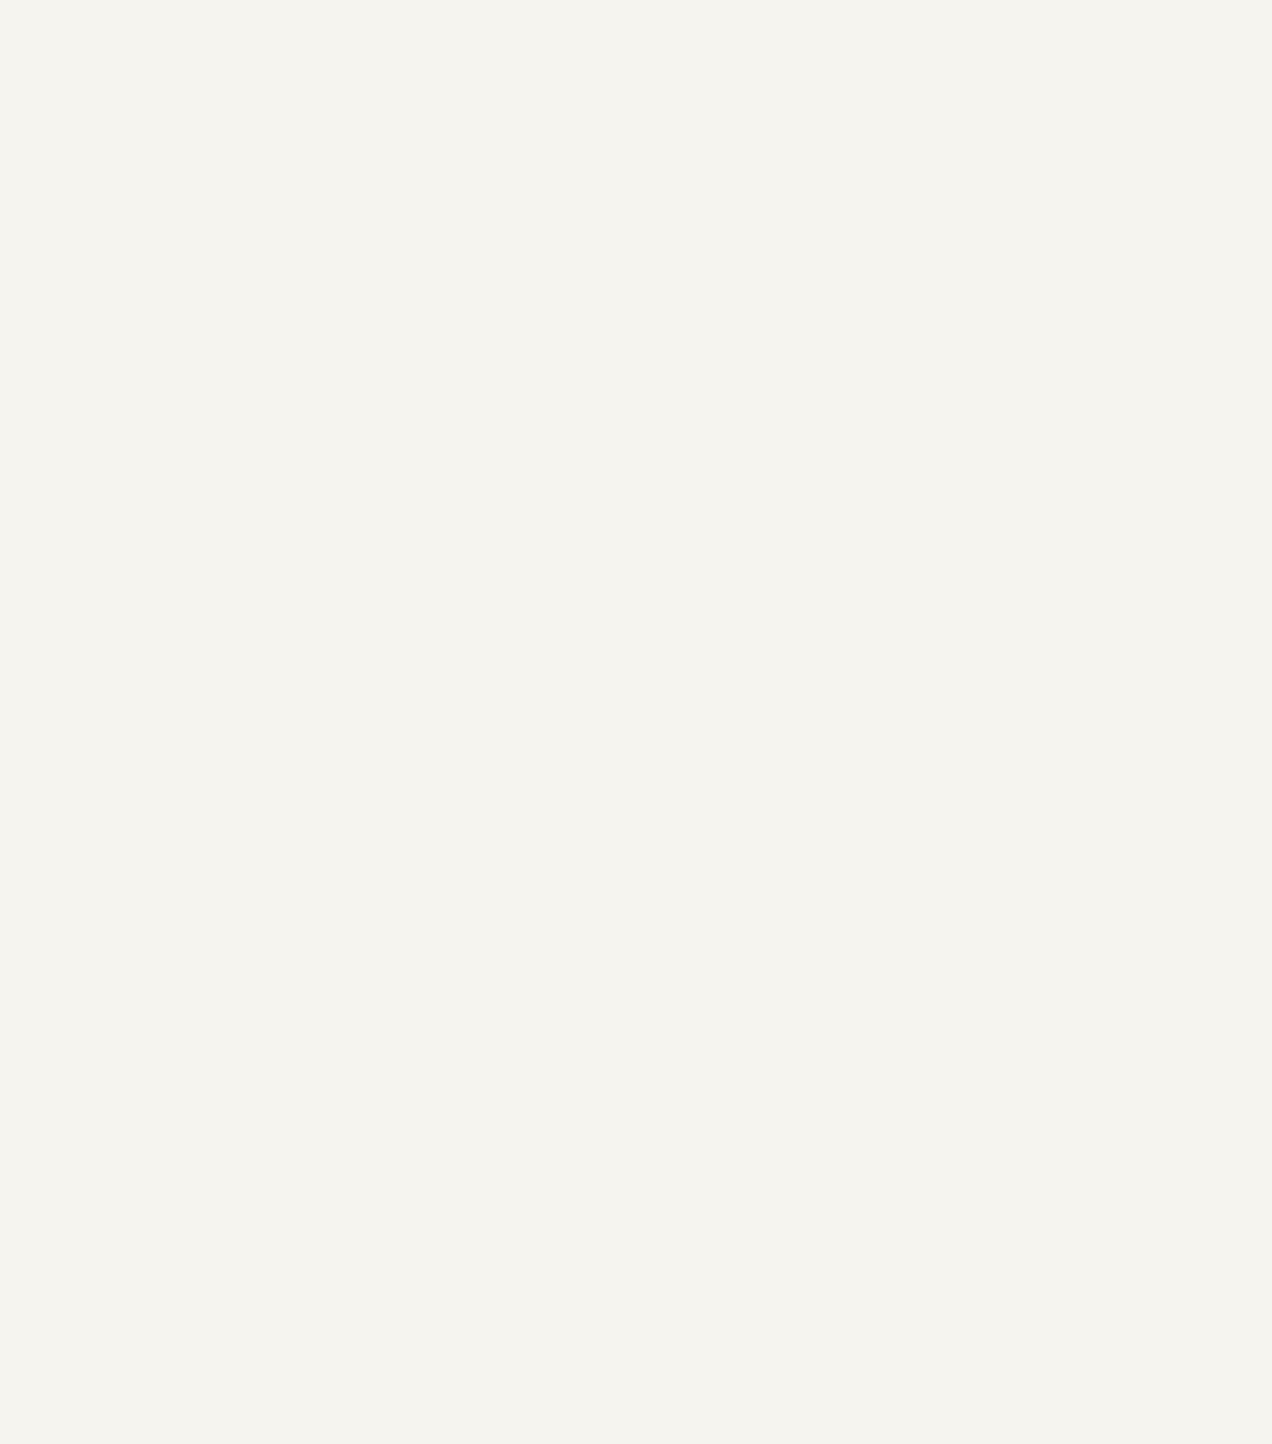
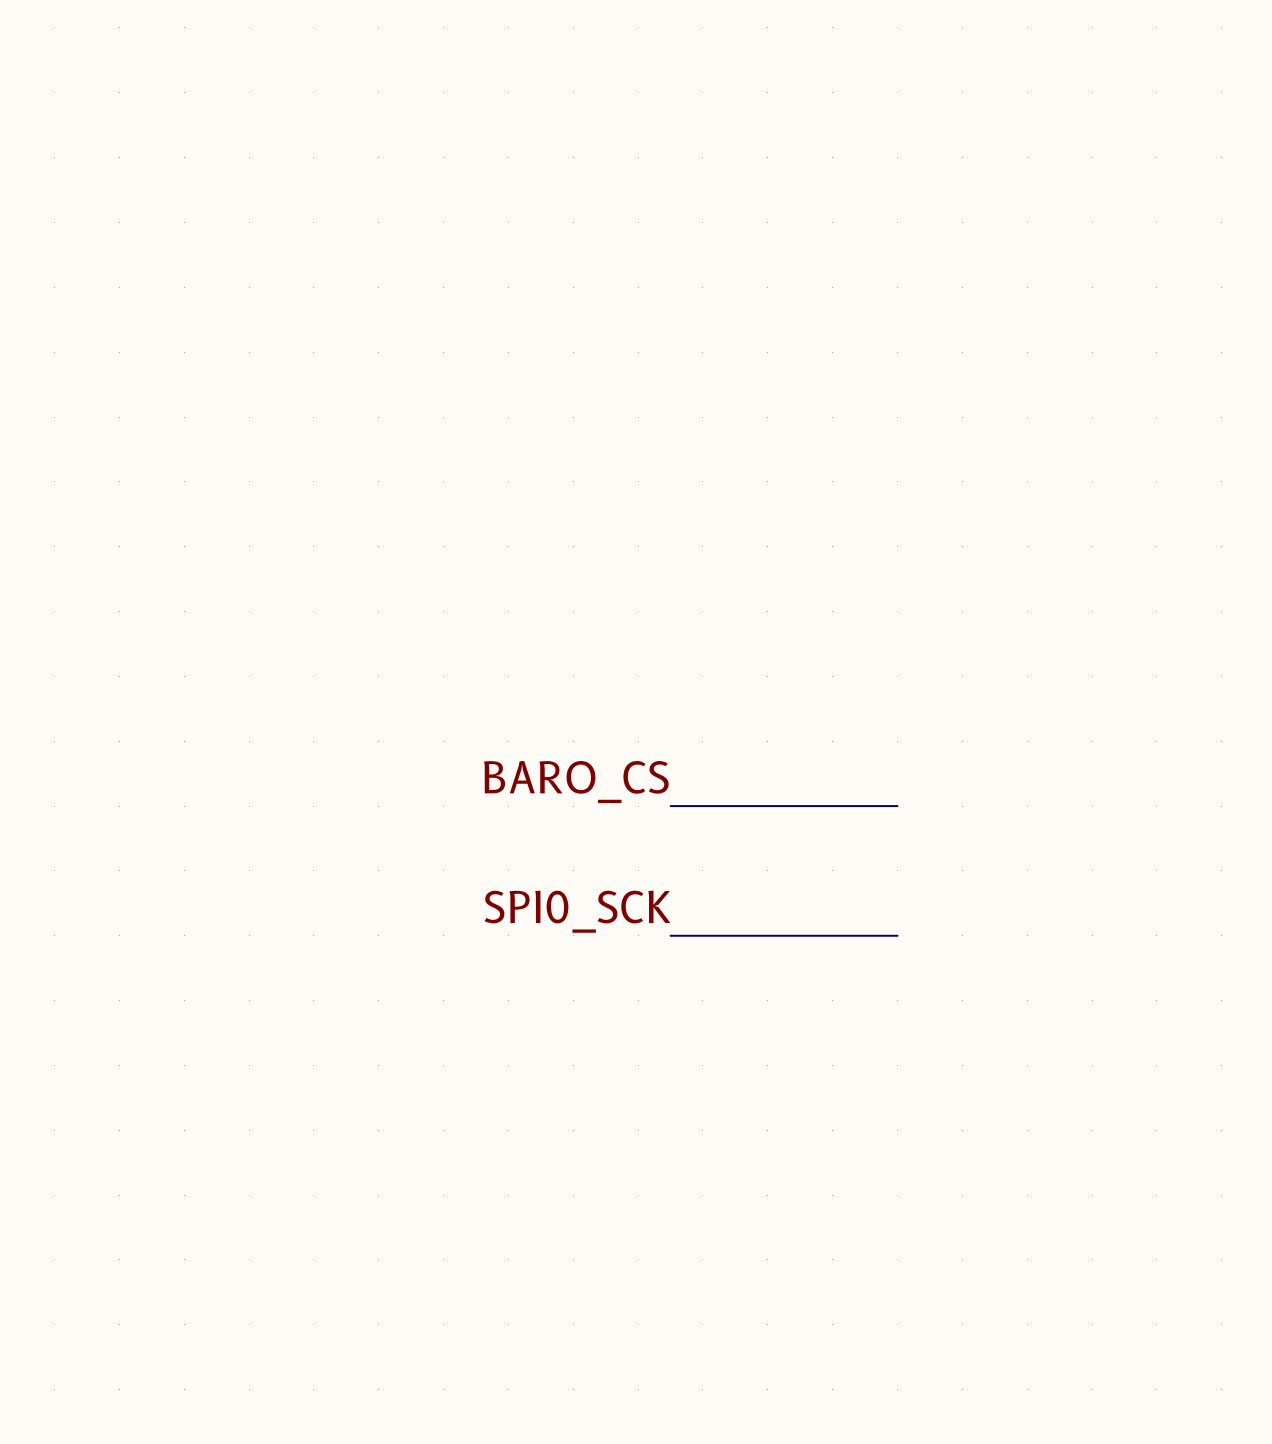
label: none -> BARO_CS (576, 781)
wire: none -> (670, 806) (897, 806)
label: none -> SPI0_SCK (577, 911)
wire: none -> (670, 935) (897, 935)

